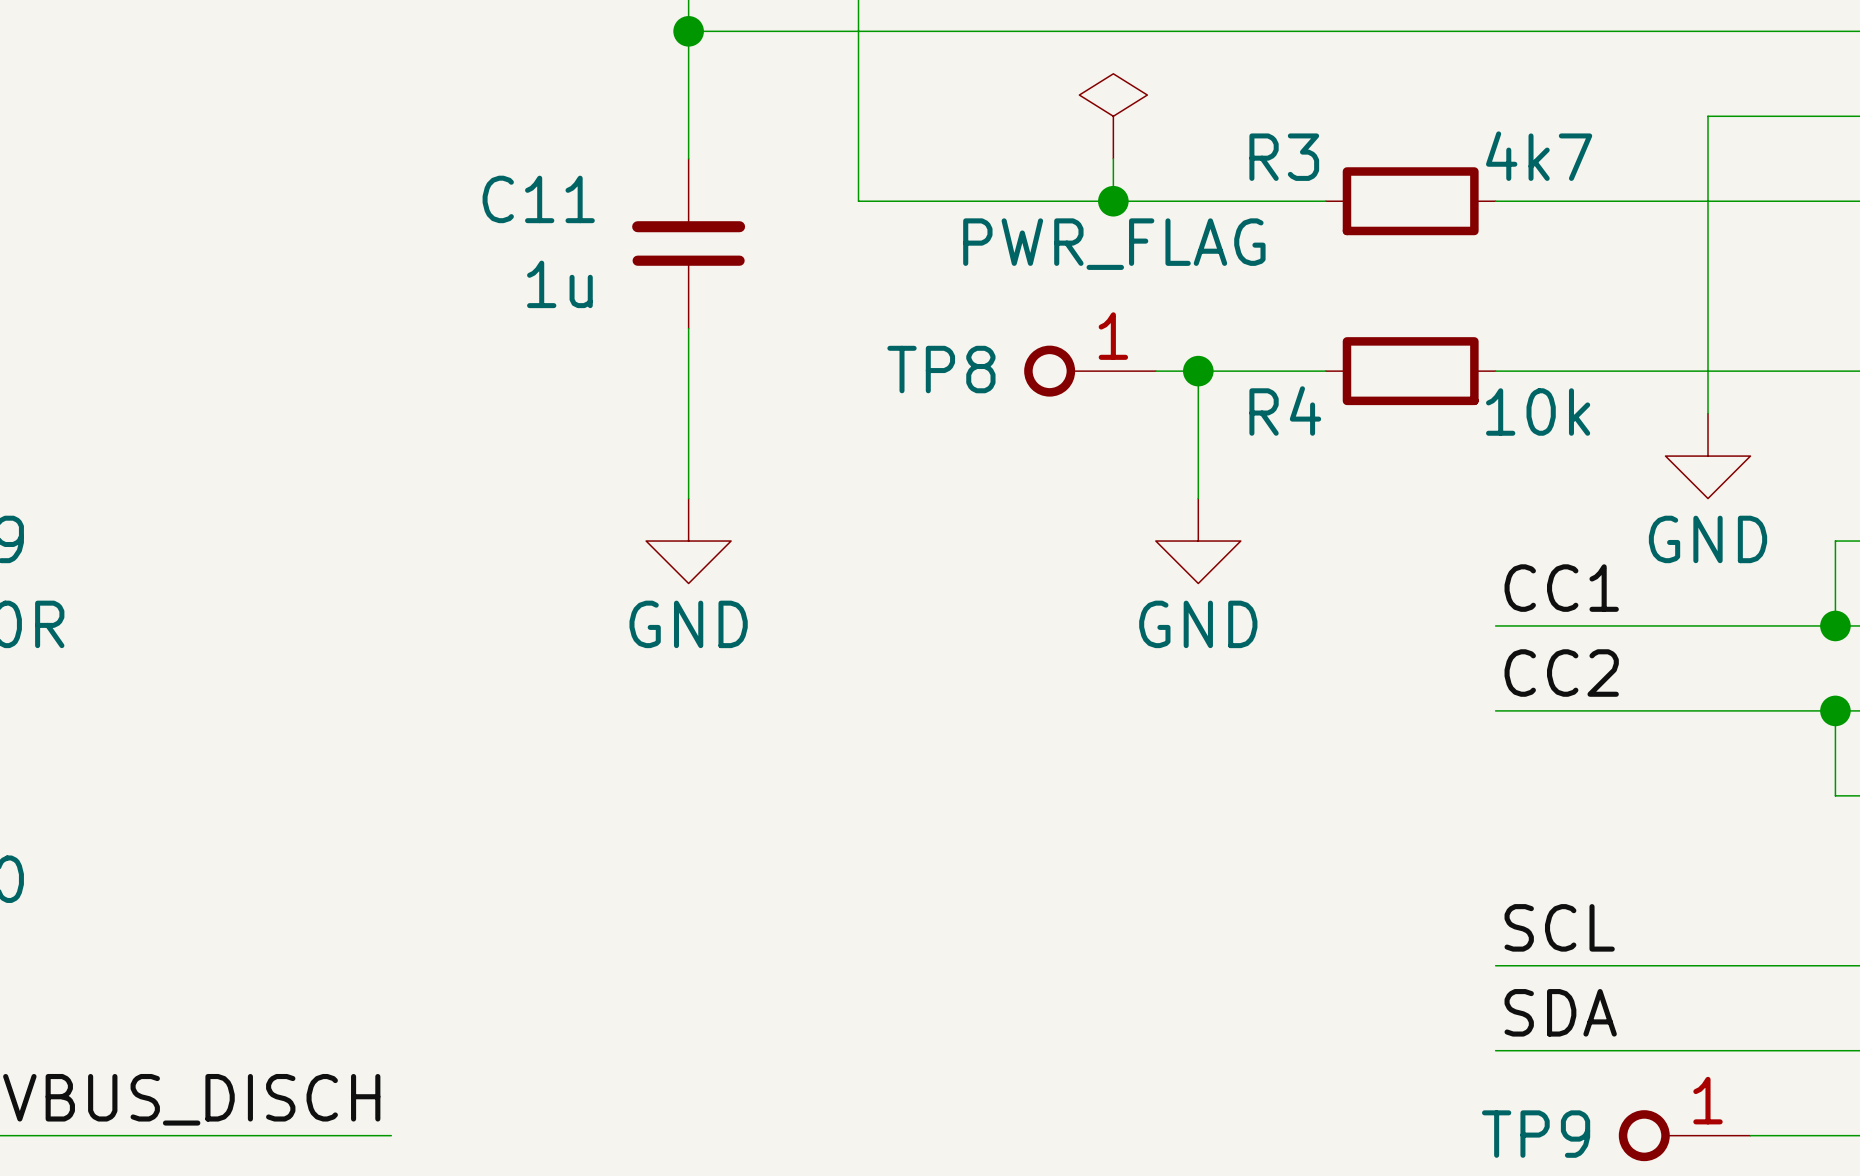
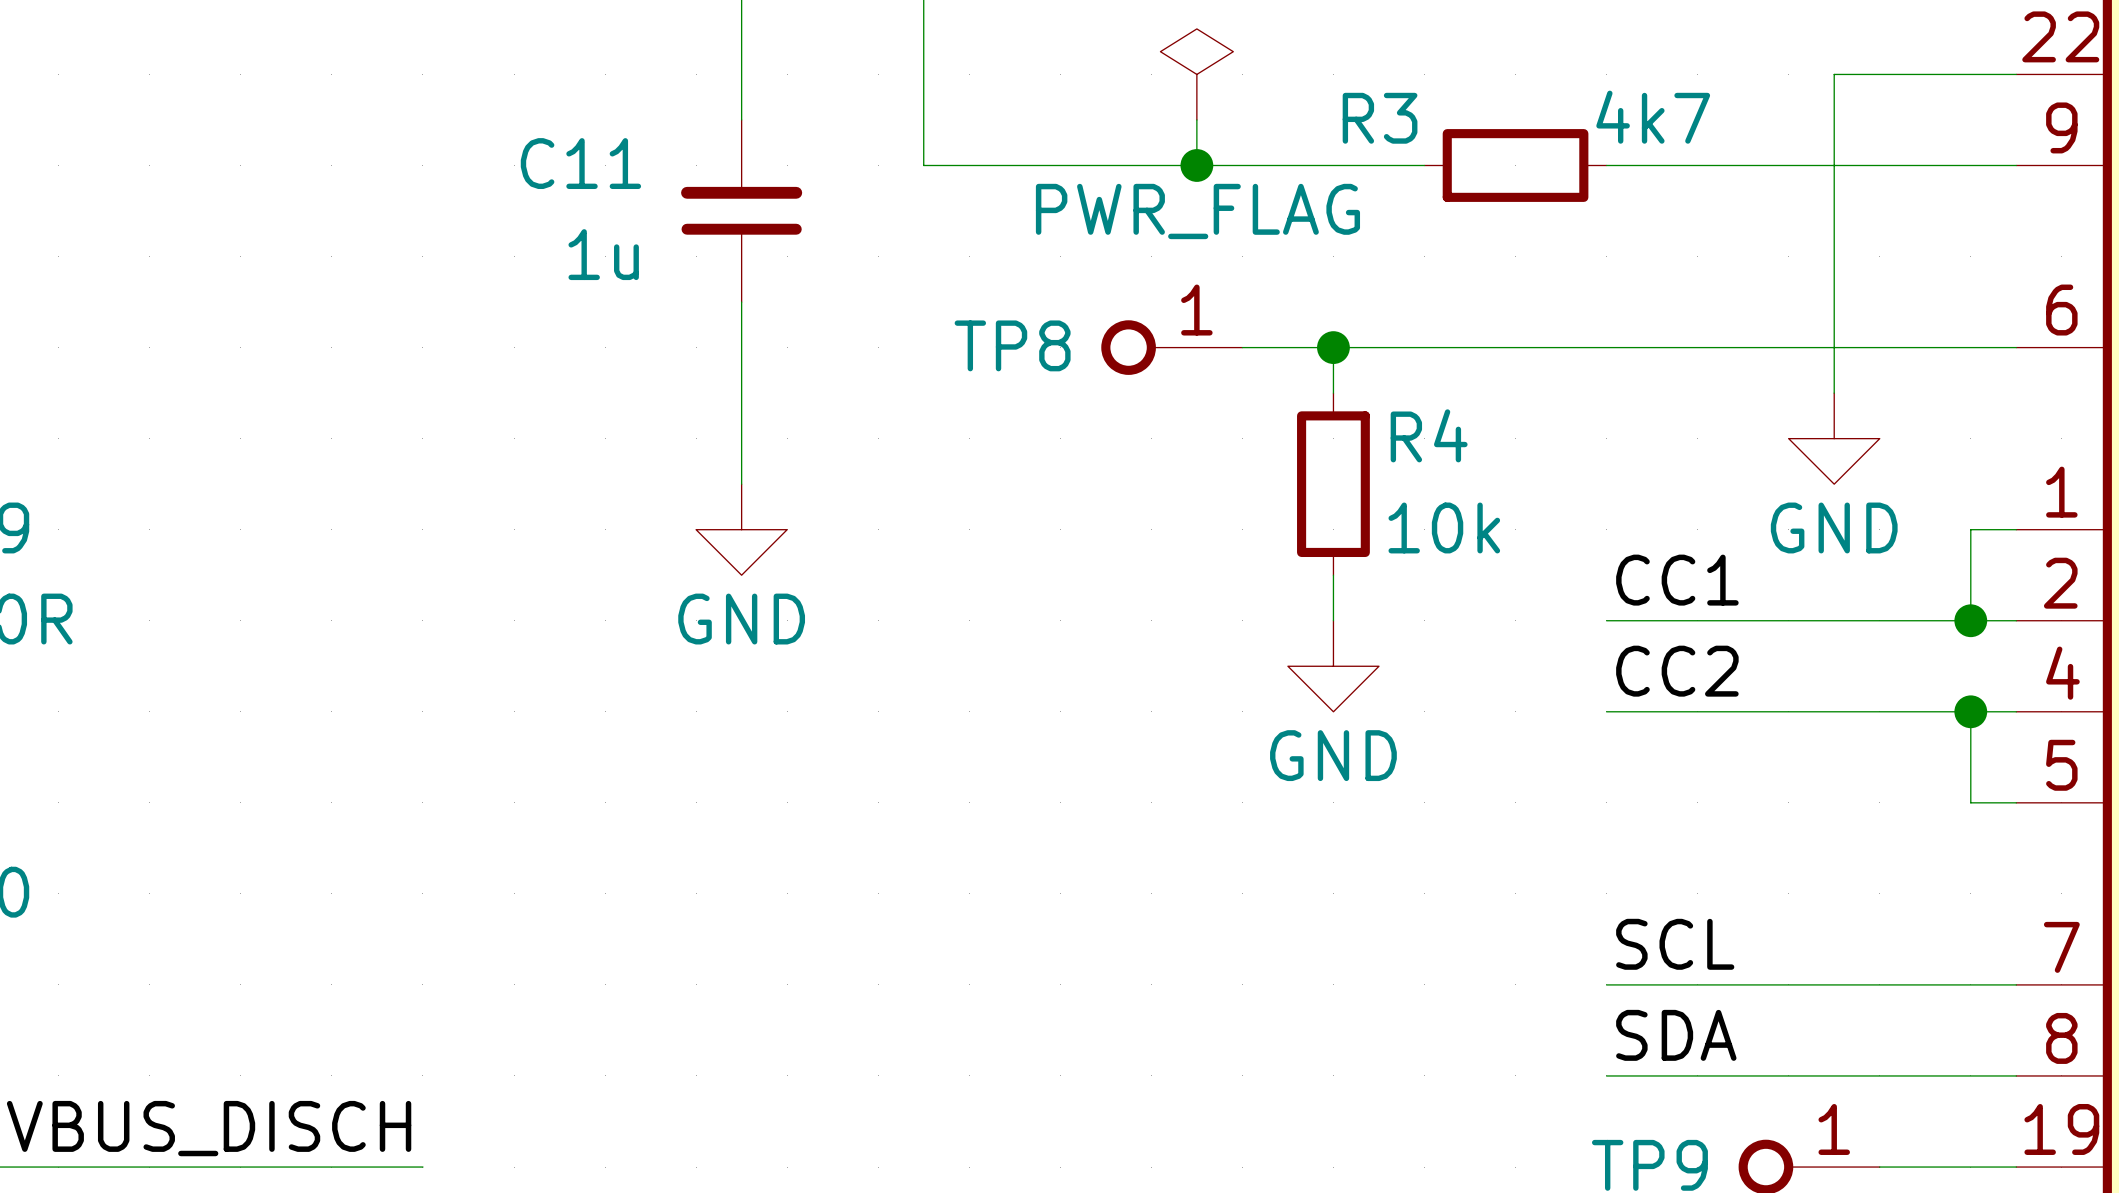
wire: (1198, 371) (1198, 498) -> none
junction position: (1198, 371) -> (1333, 347)
wire: none -> (1333, 347) (1333, 393)
wire: none -> (1424, 347) (1606, 347)
R4 rotation: 0° (1410, 371) -> 90° clockwise (1333, 484)
R4 position: (1410, 371) -> (1333, 484)
R4 name position: R4 (1285, 411) -> R4 (1429, 435)
power symbol position: GND (1198, 541) -> GND (1333, 666)
wire: none -> (1333, 575) (1333, 620)

